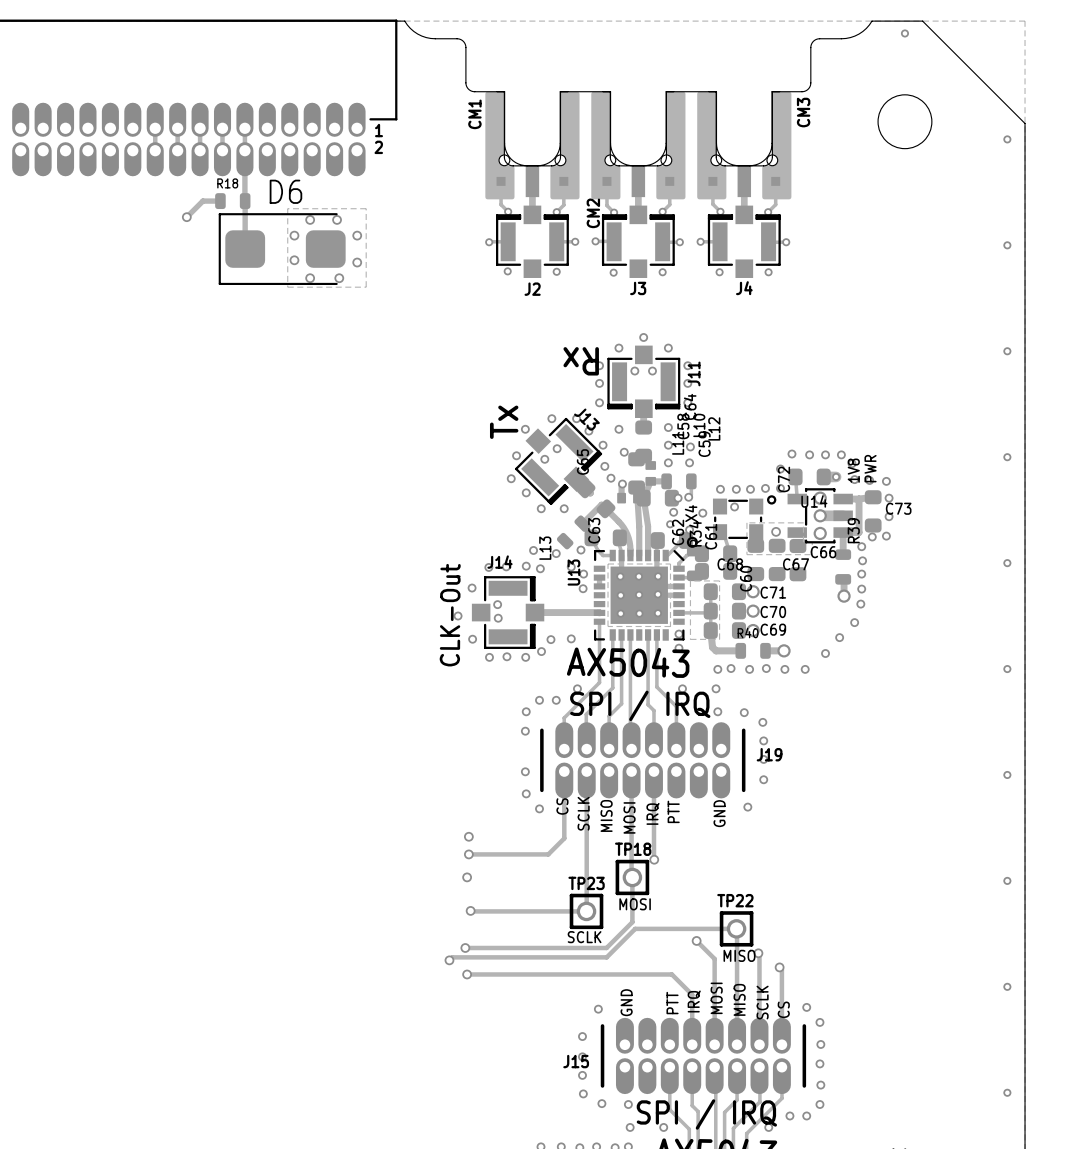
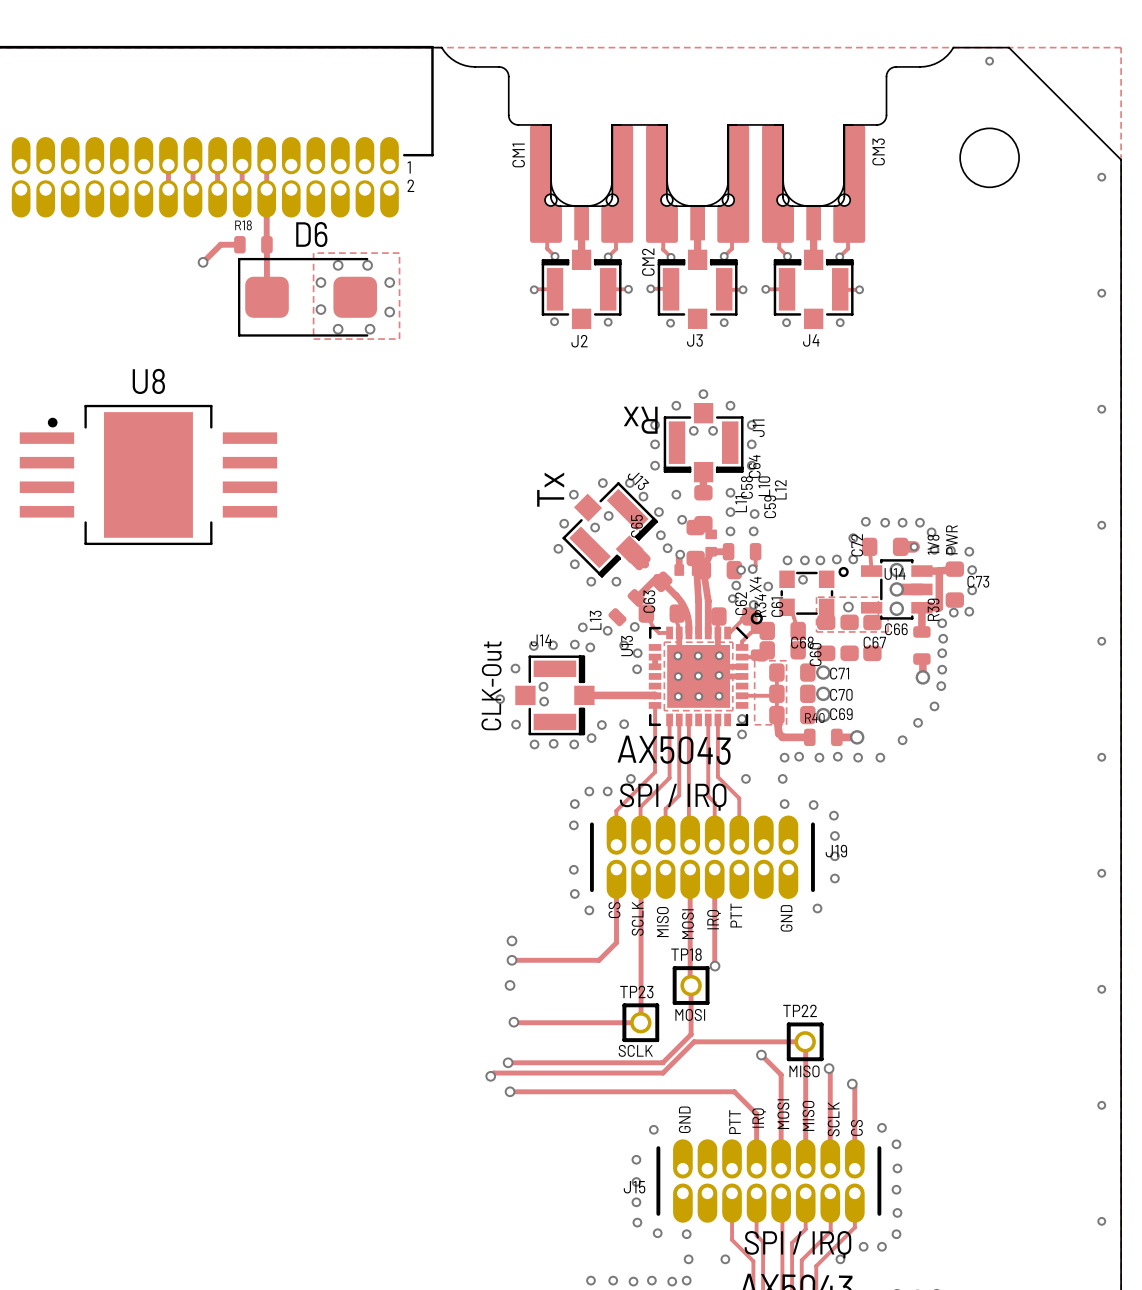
U8: none -> (148, 474)

